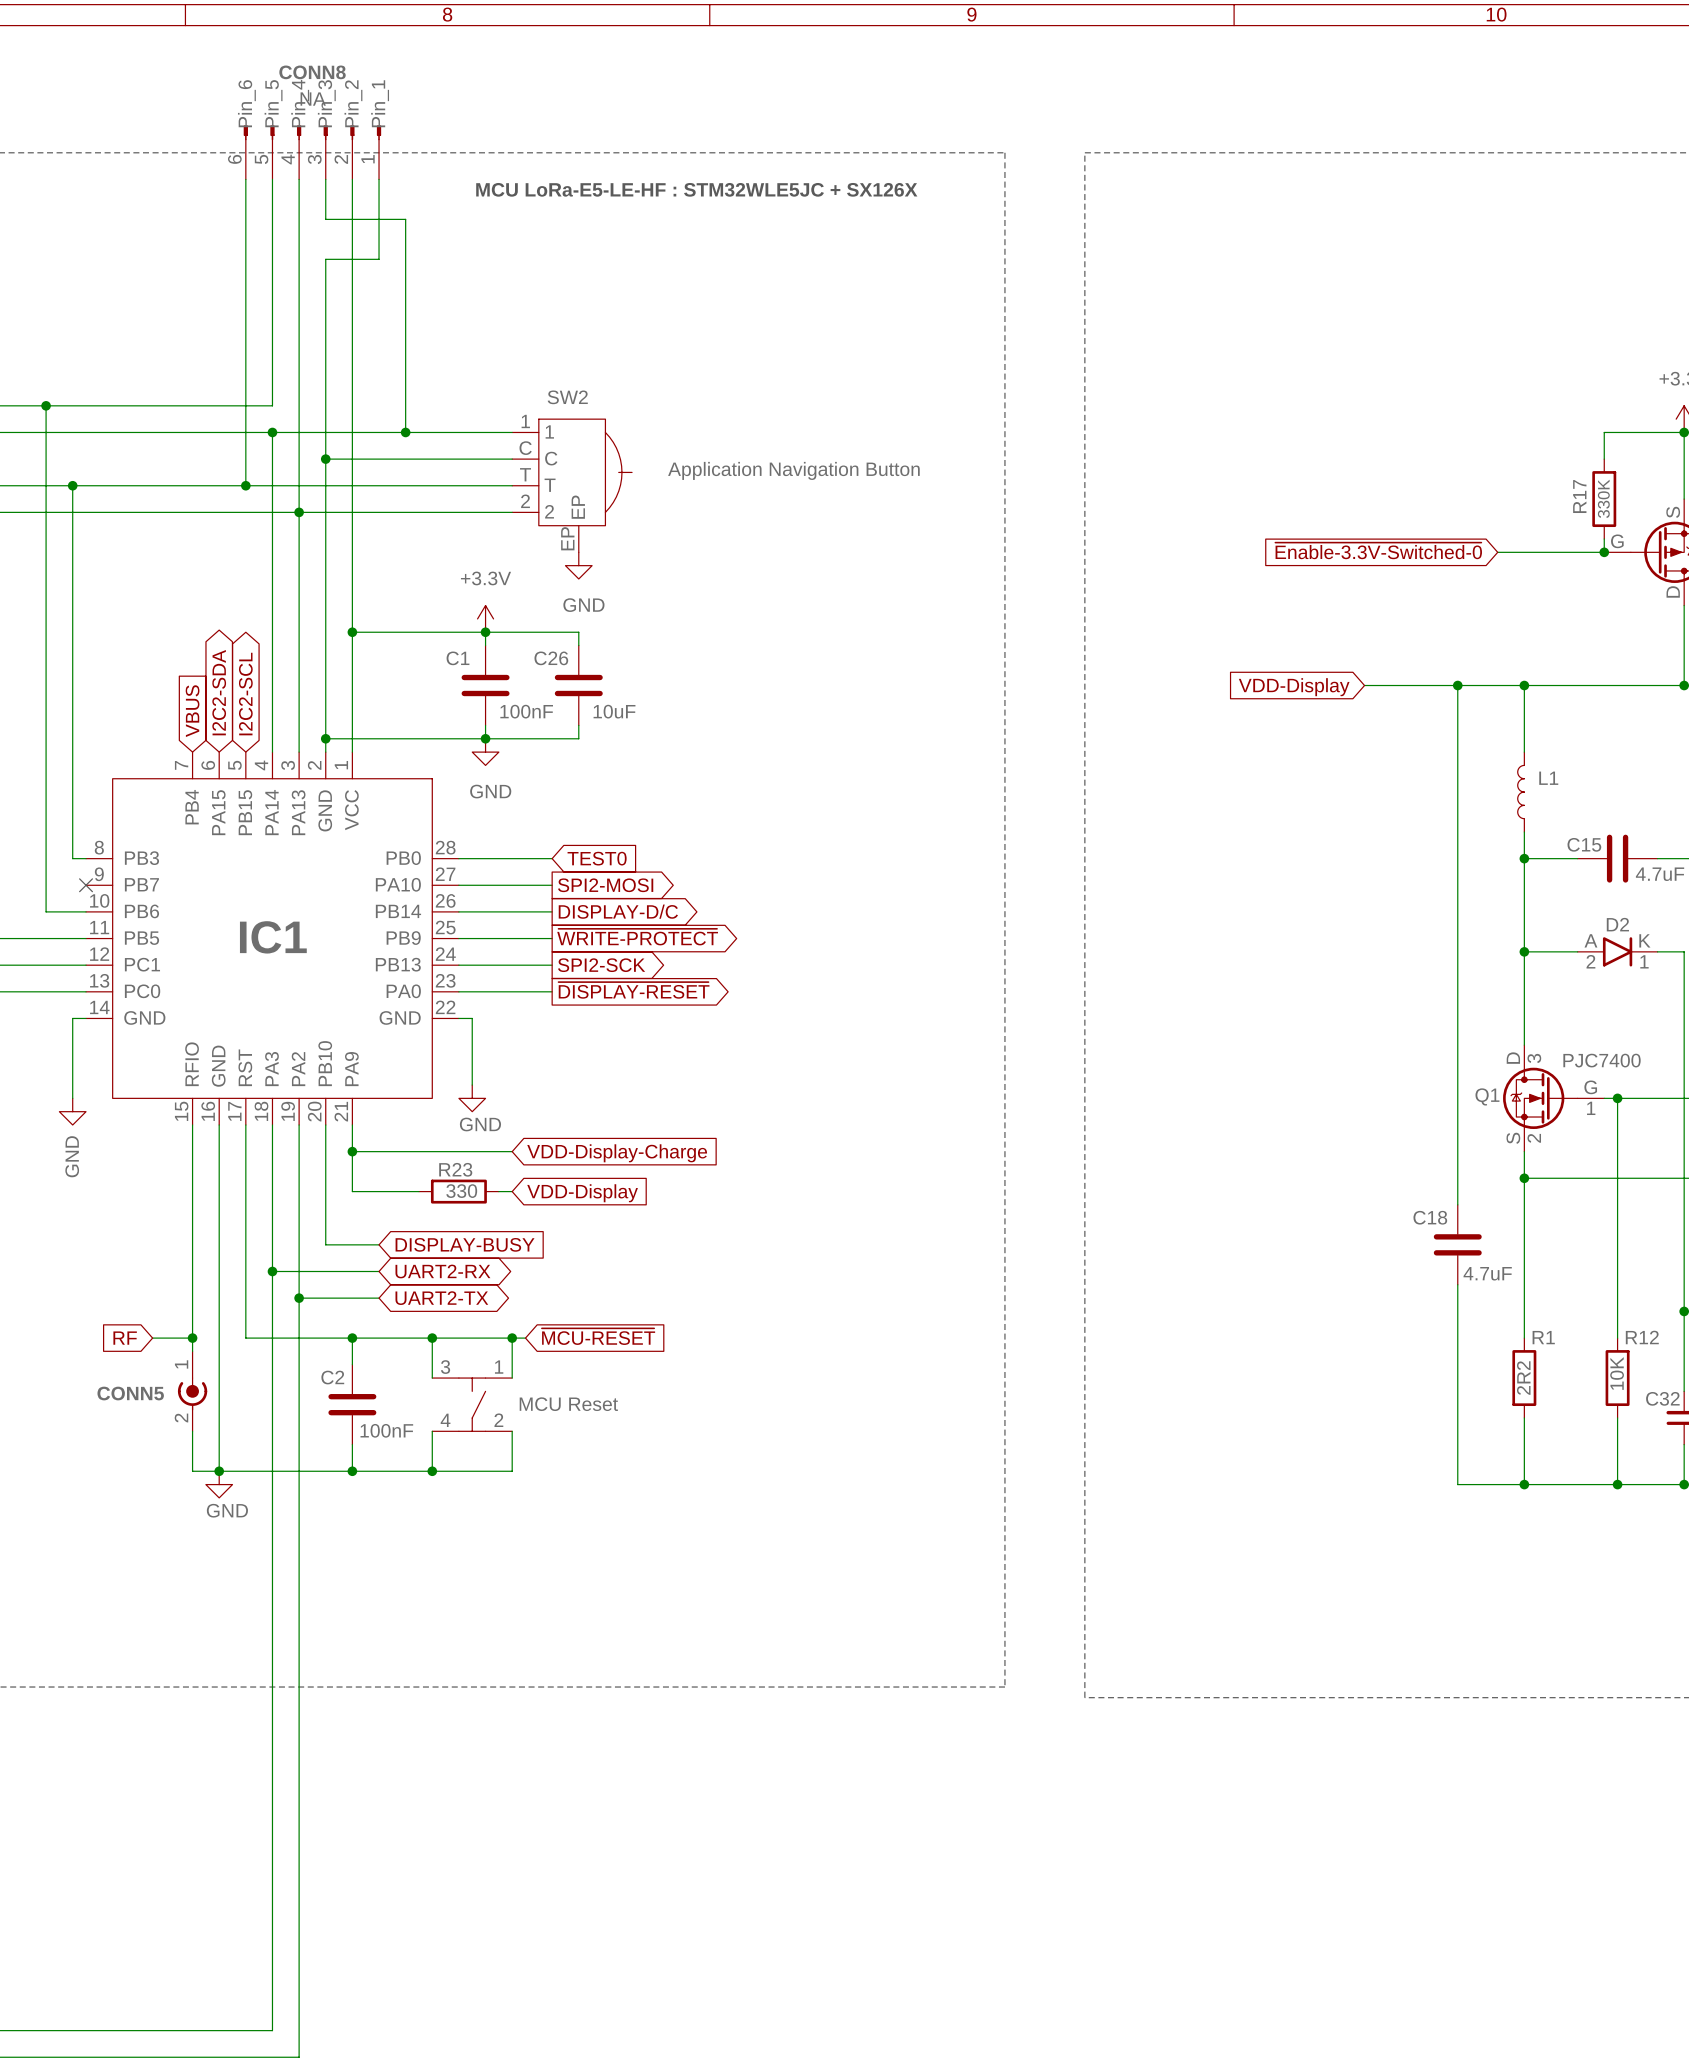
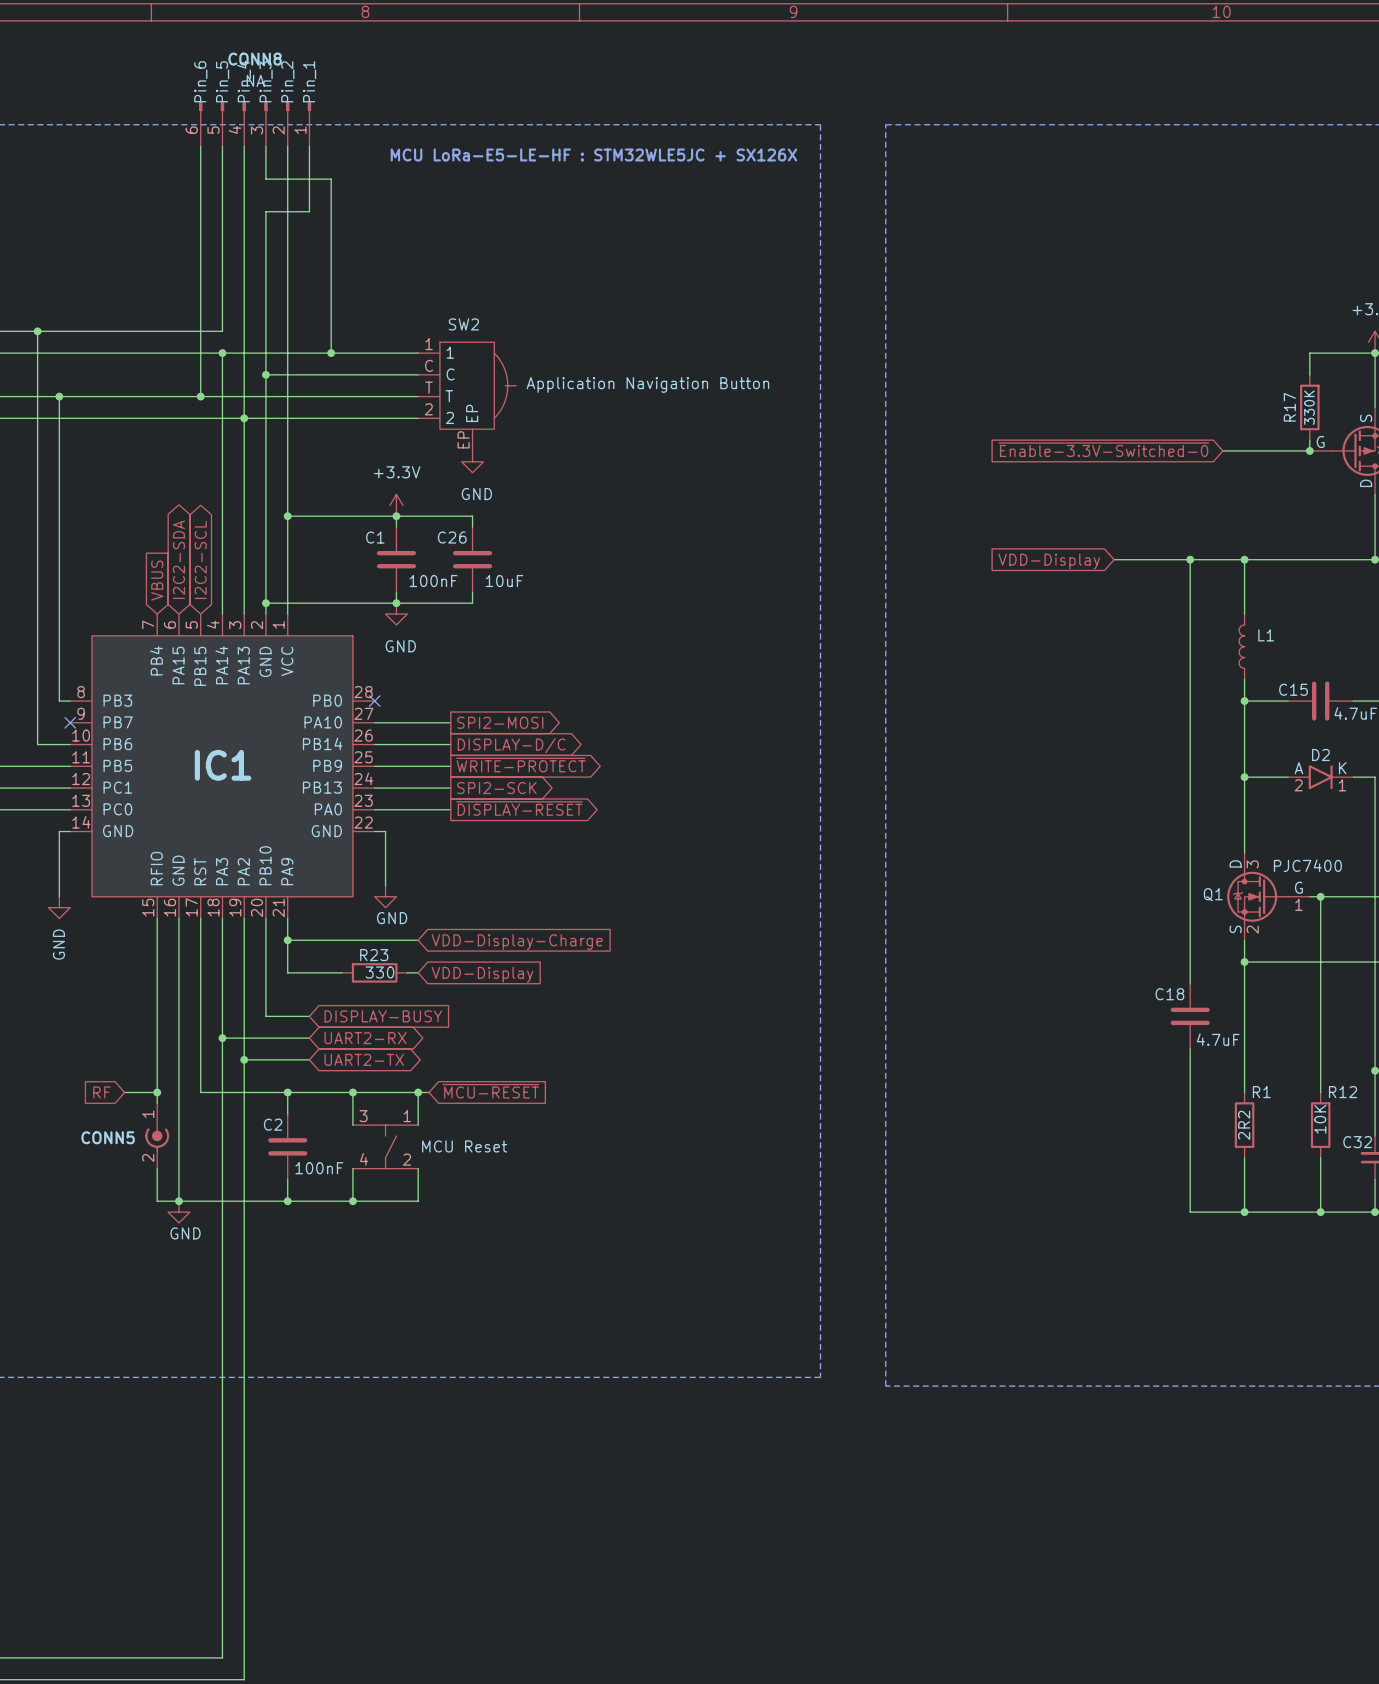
wire: (458, 858) (552, 858) -> none
no-connect mark: none -> (374, 701)
global label: TEST0 (597, 858) -> none

